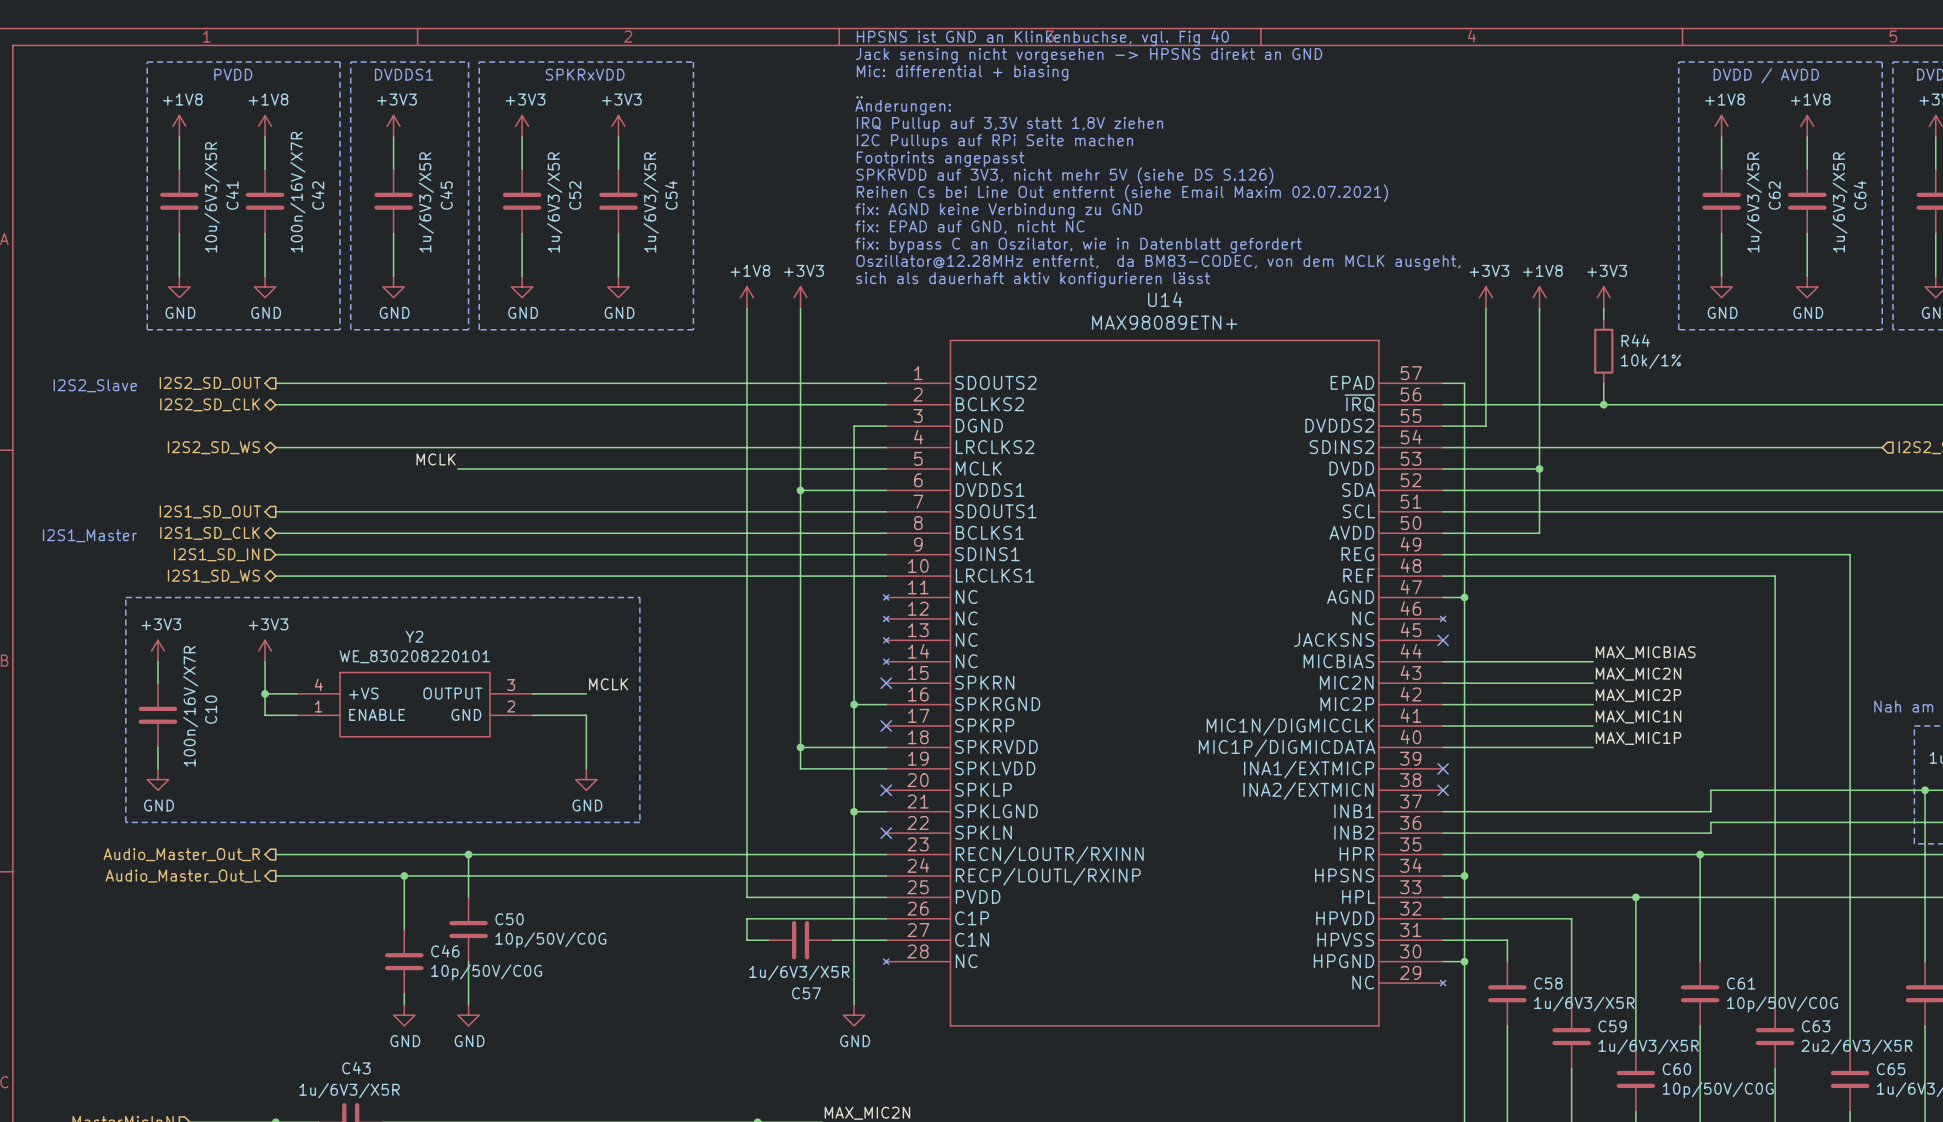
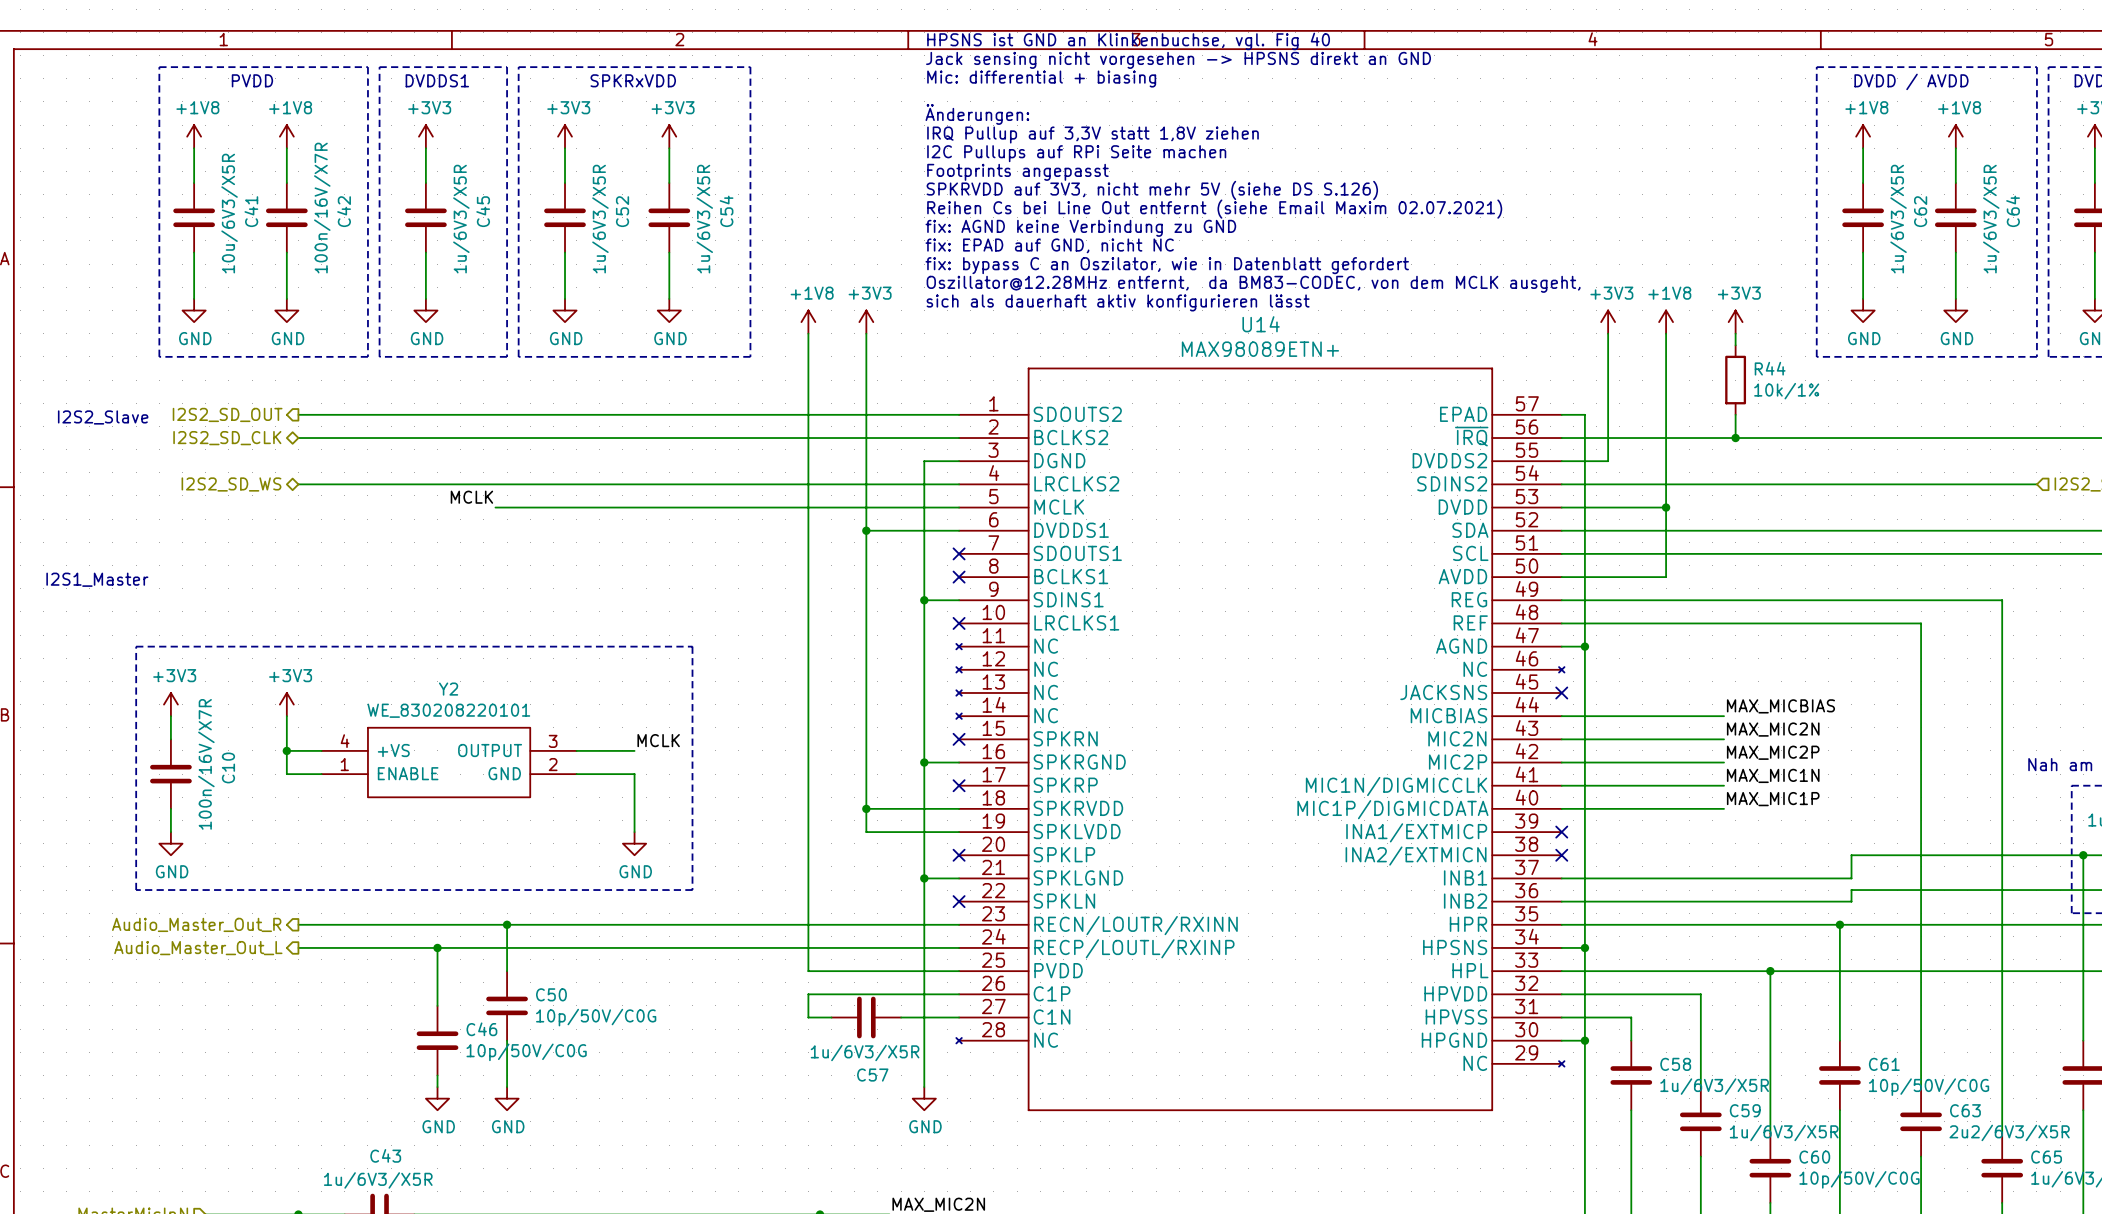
hierarchical label: I2S1_SD_OUT (210, 511) -> none
wire: (275, 511) (886, 511) -> none
no-connect mark: none -> (959, 553)
hierarchical label: I2S1_SD_CLK (210, 533) -> none
wire: (275, 533) (886, 533) -> none
no-connect mark: none -> (959, 577)
hierarchical label: I2S1_SD_IN (216, 554) -> none
wire: (275, 554) (854, 554) -> none
junction: none -> (924, 600)
hierarchical label: I2S1_SD_WS (213, 576) -> none
wire: (275, 576) (886, 576) -> none
no-connect mark: none -> (959, 623)

